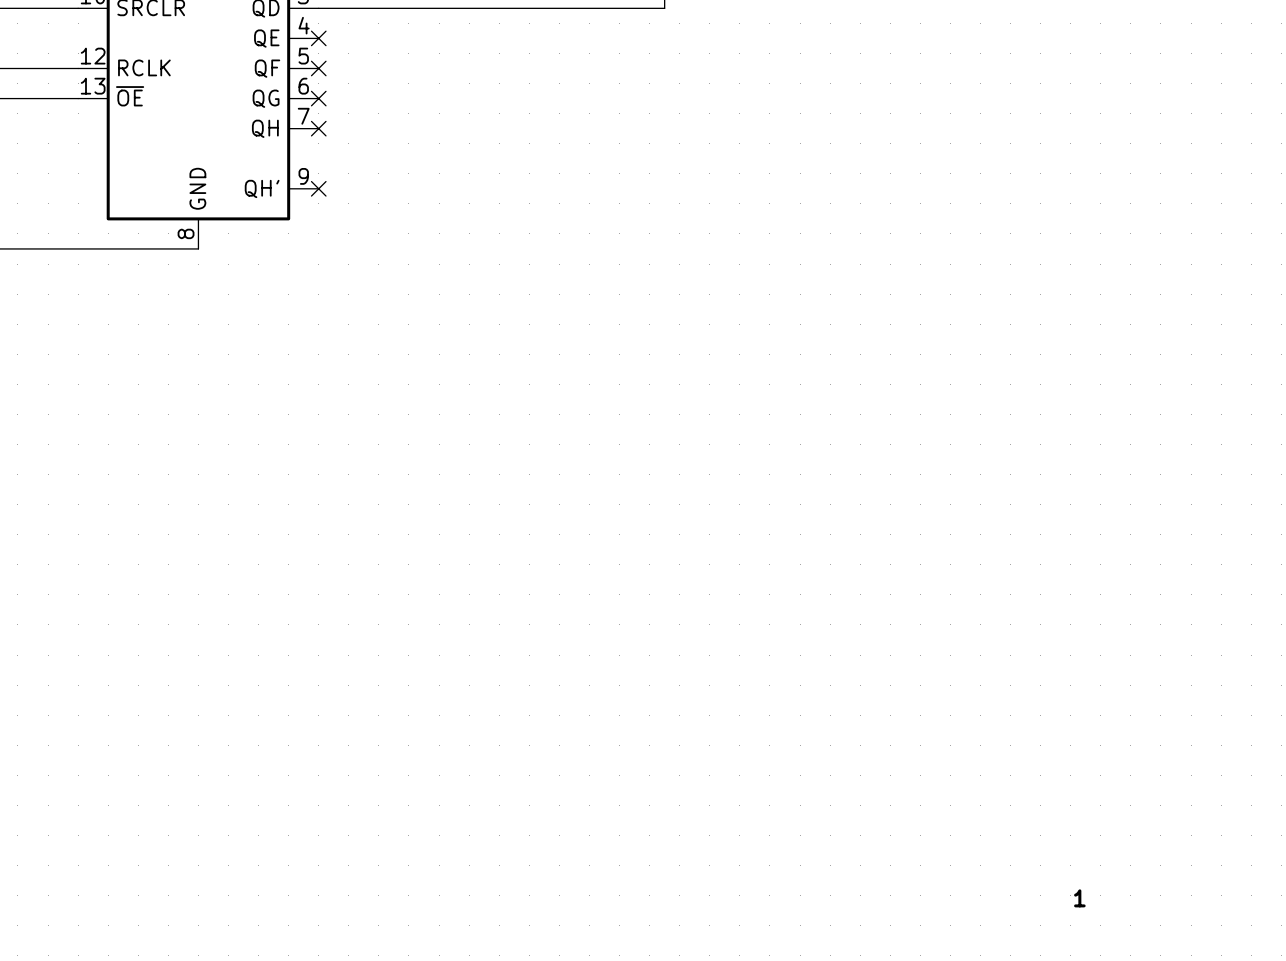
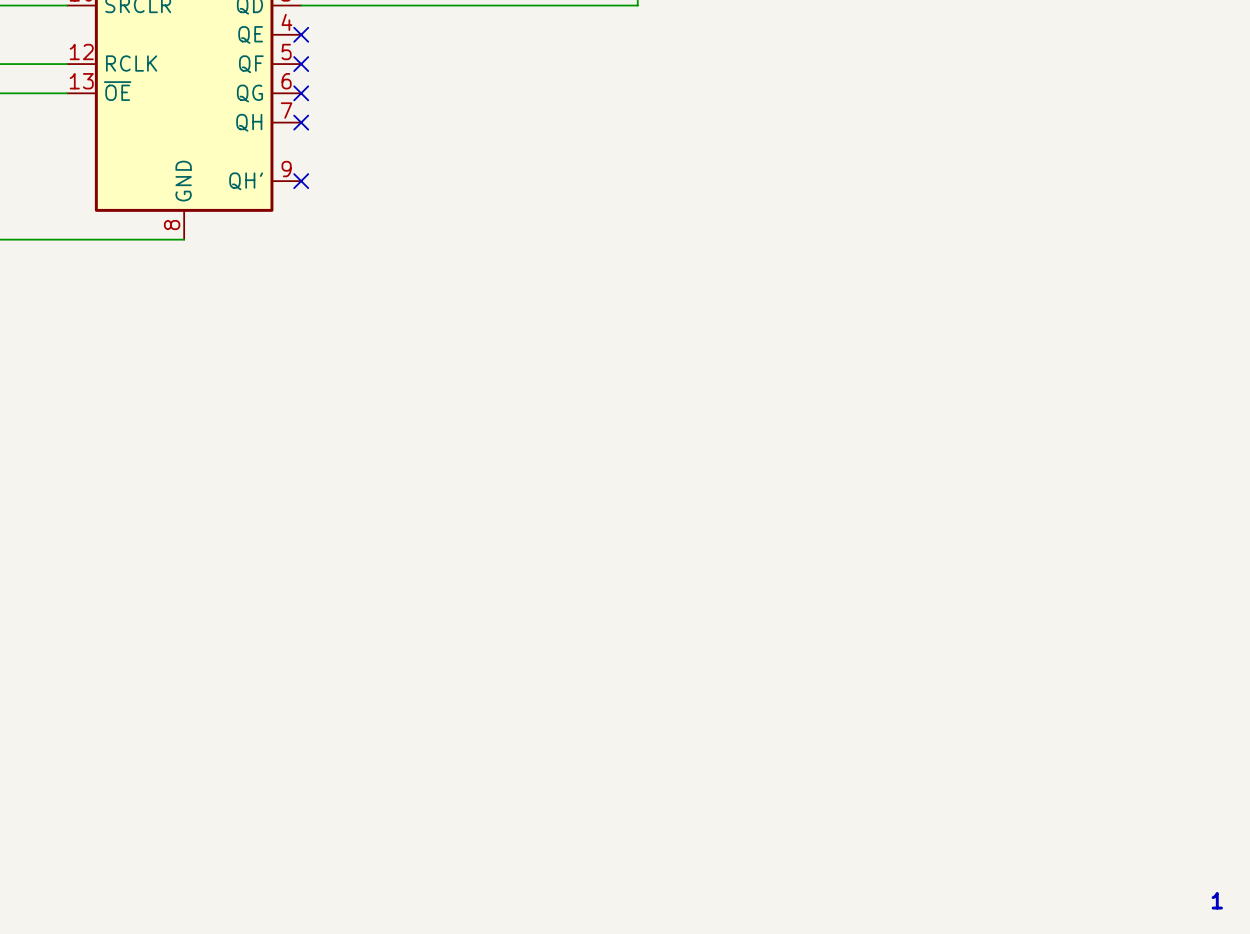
text position: 1 (1079, 898) -> 1 (1217, 900)

